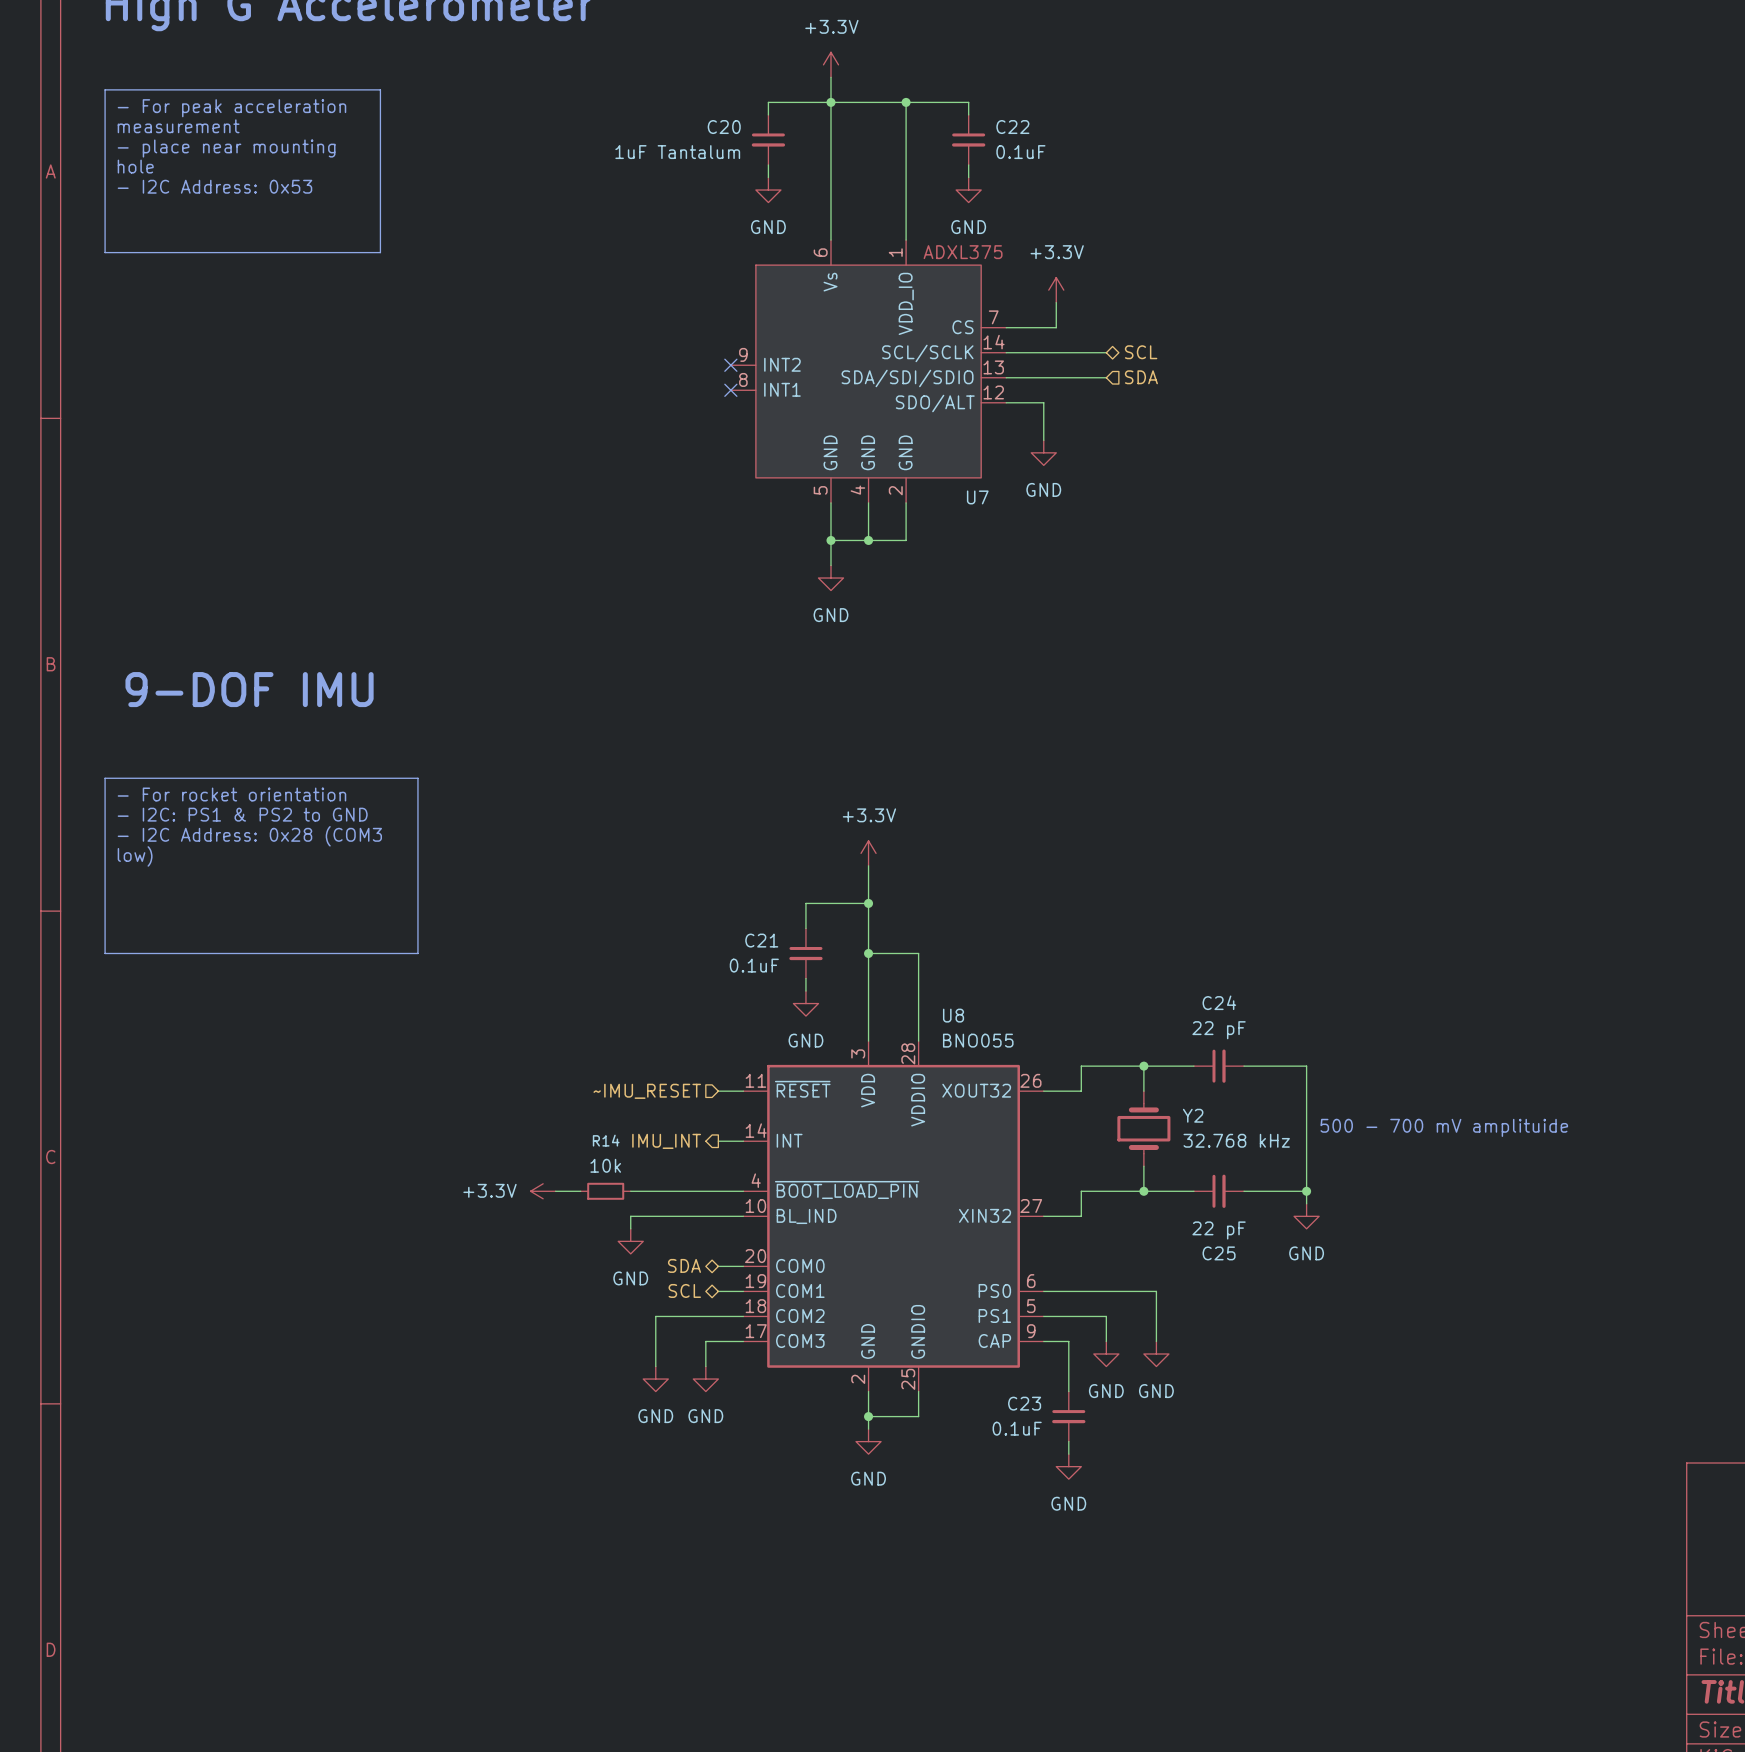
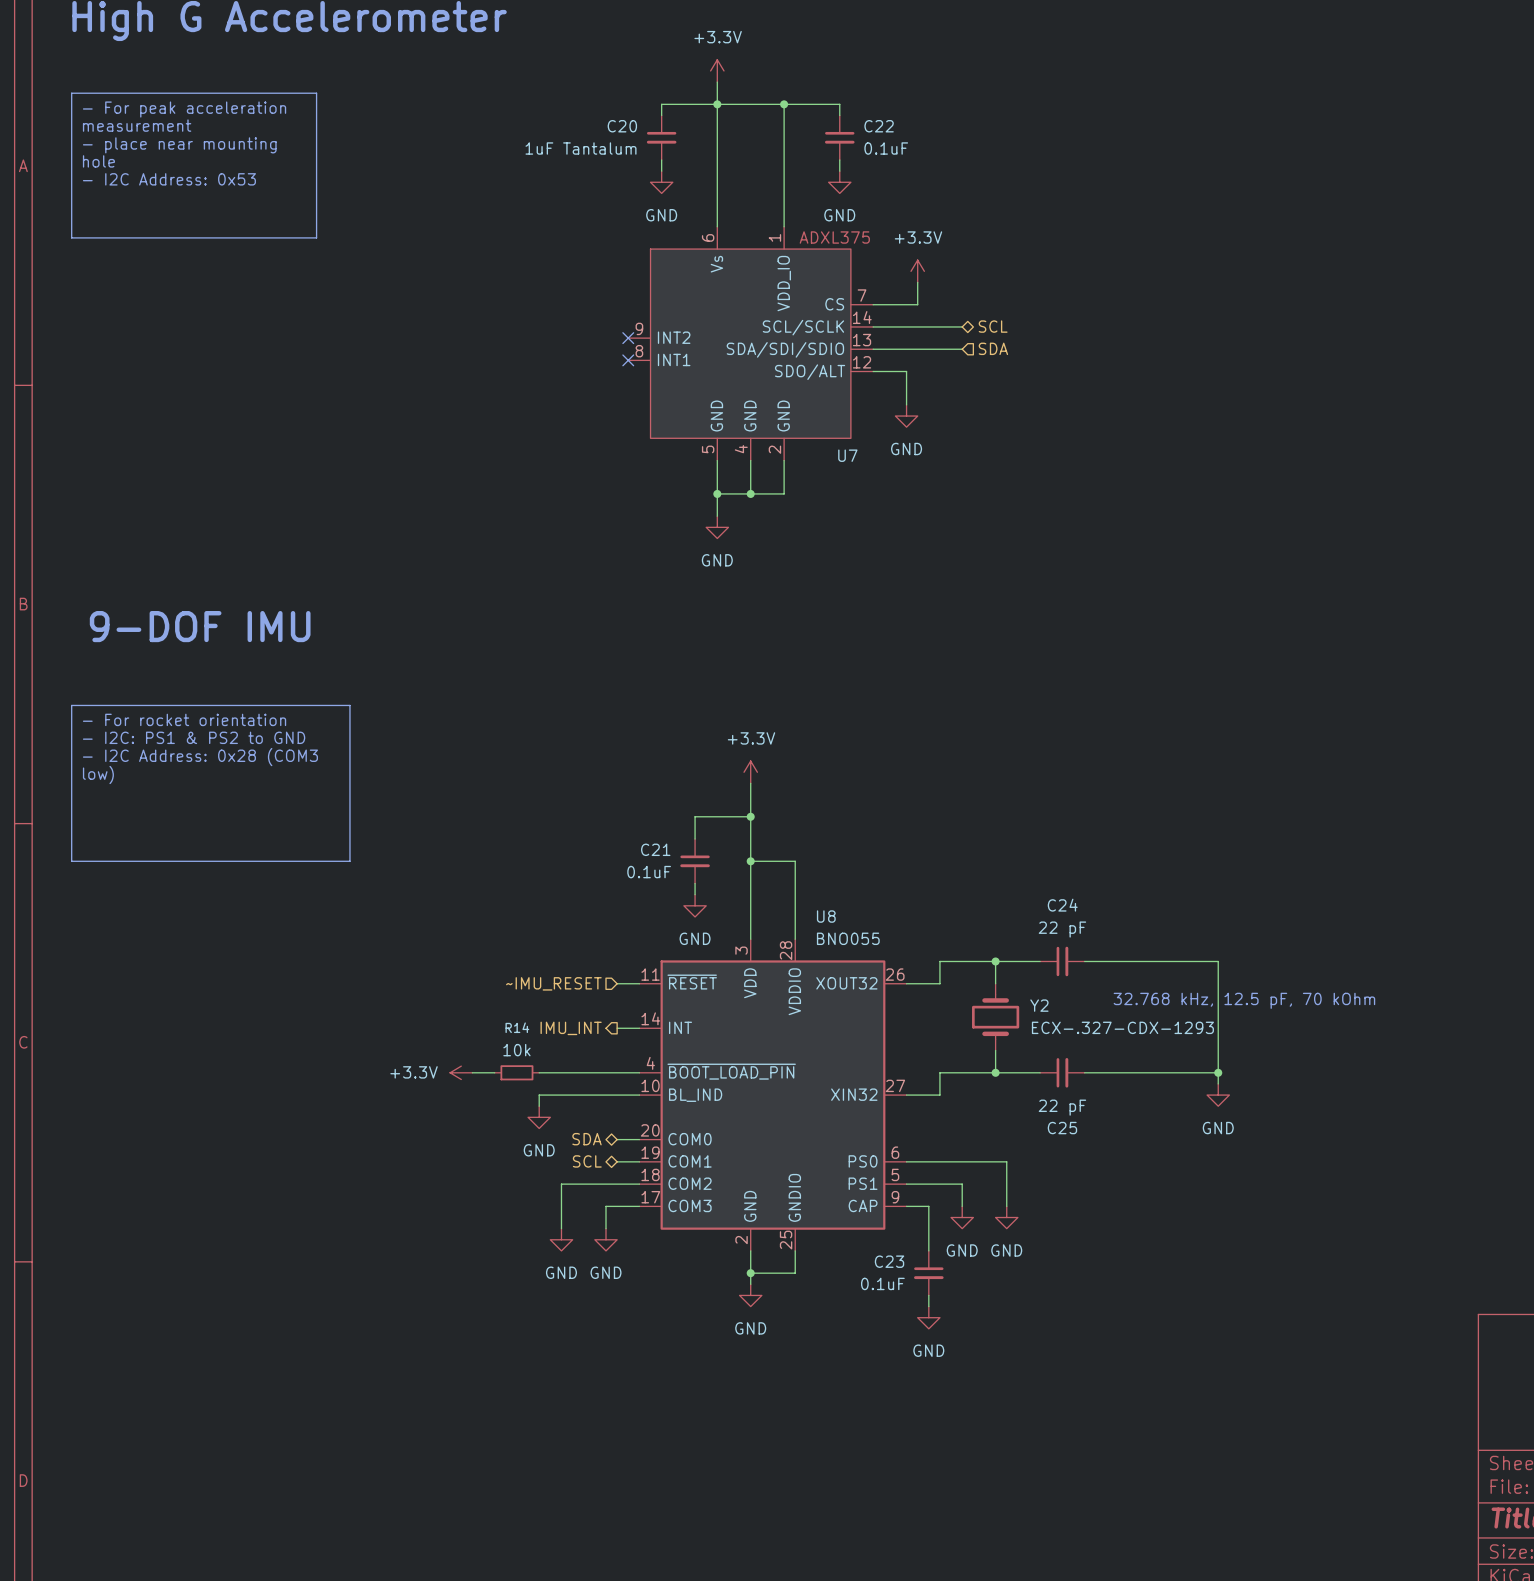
wire: (1306, 1066) (1306, 1203) -> (1140, 961) (1218, 961) (1218, 1083)
text: none -> 32.768 kHz, 12.5 pF, 70 kOhm (1244, 1000)
text: 500 - 700 mV amplituide (1444, 1127) -> none
Y2 value: 32.768 kHz (1236, 1140) -> ECX-.327-CDX-1293 (1122, 1027)
wire: none -> (1140, 1072) (1218, 1072)
junction: (1306, 1191) -> none
junction: none -> (1218, 1072)
power symbol position: GND (1306, 1216) -> GND (1218, 1095)

